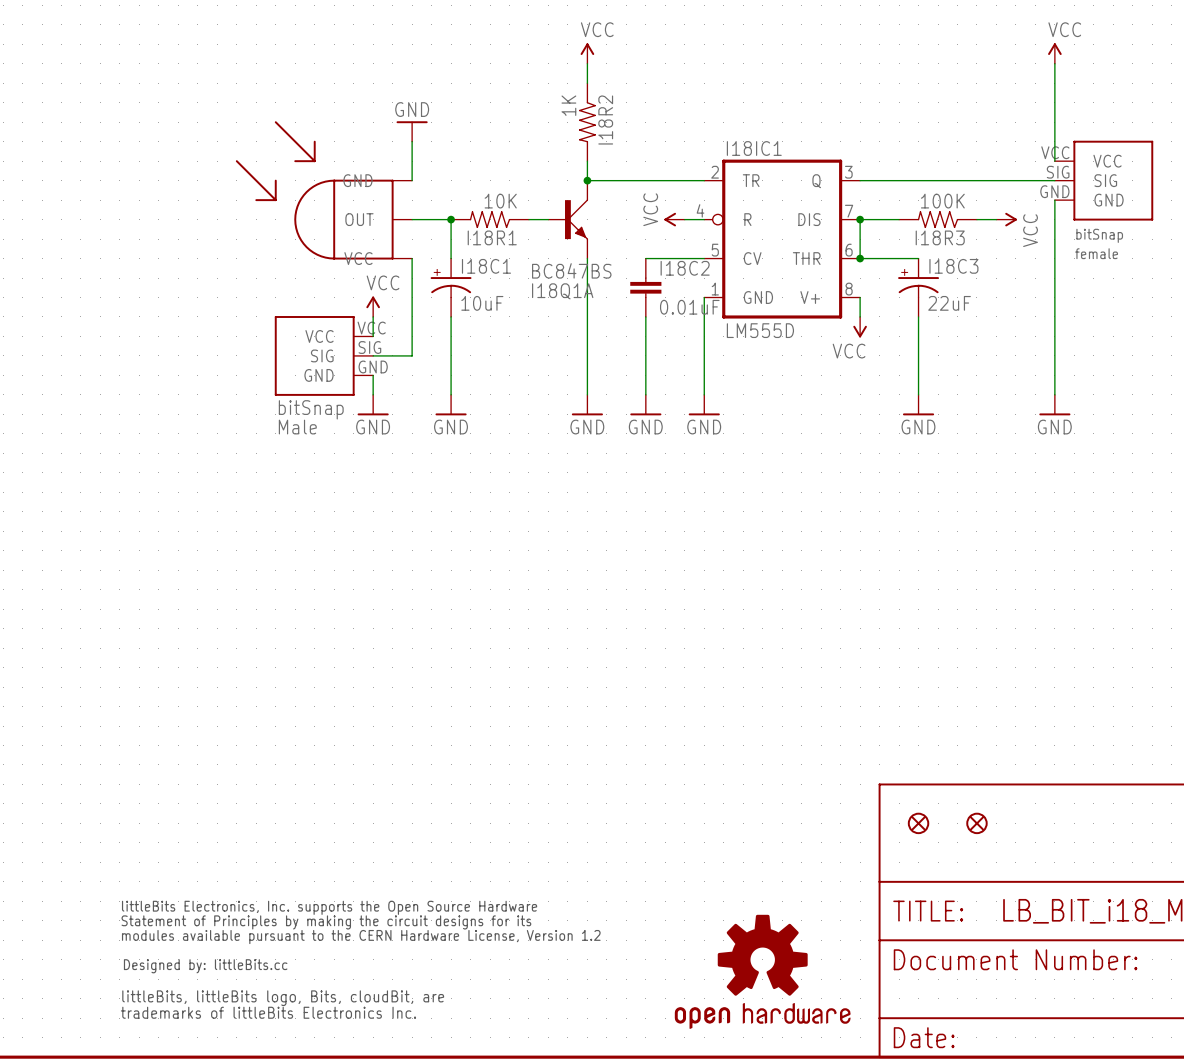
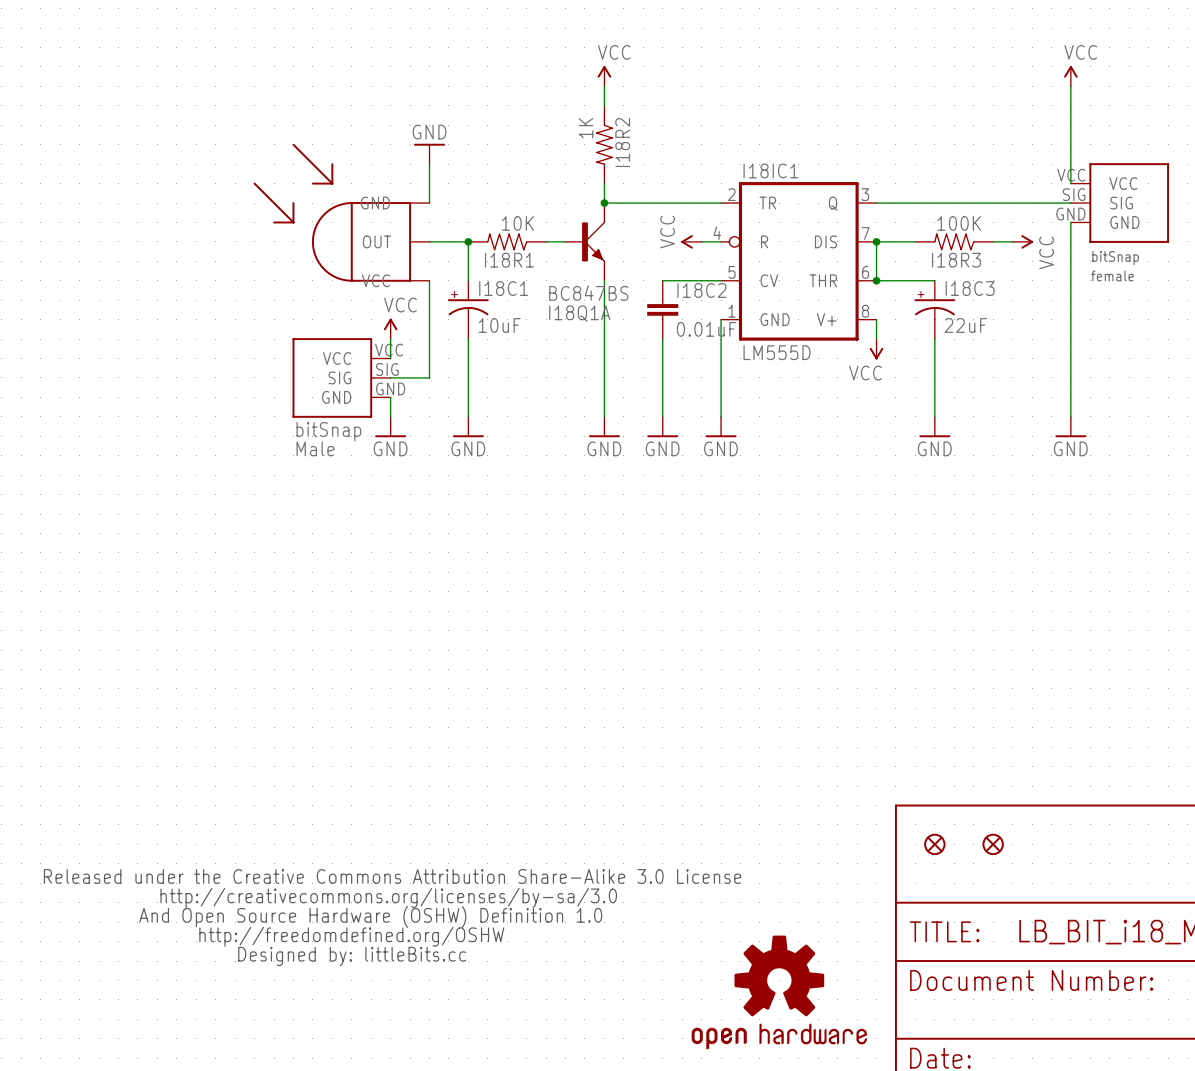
part: none -> (392, 917)
part: (360, 959) -> none

